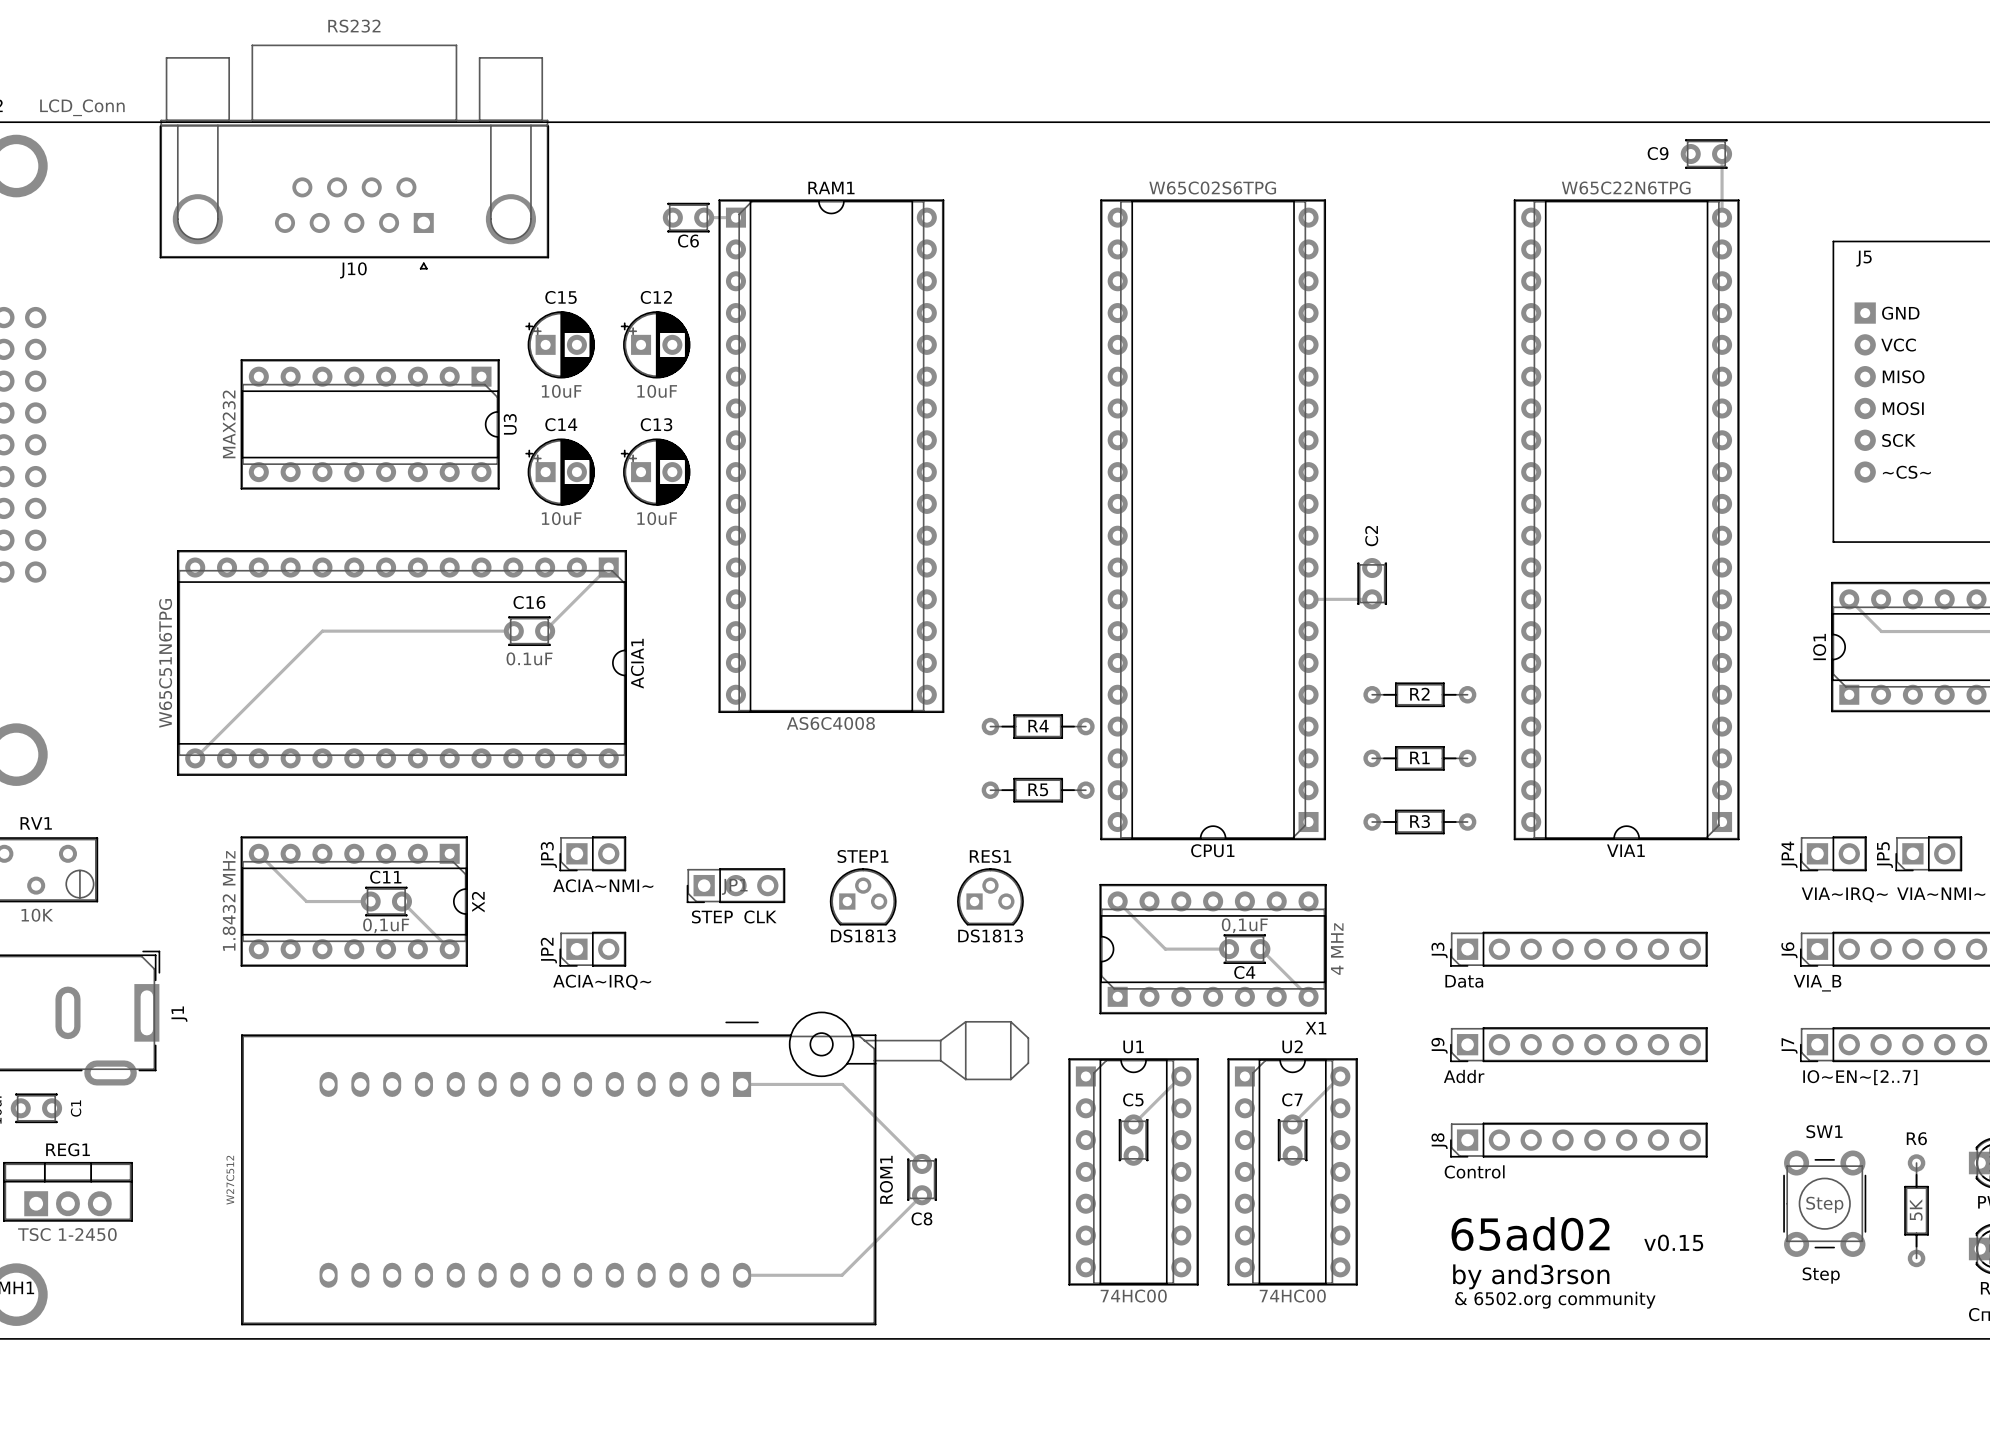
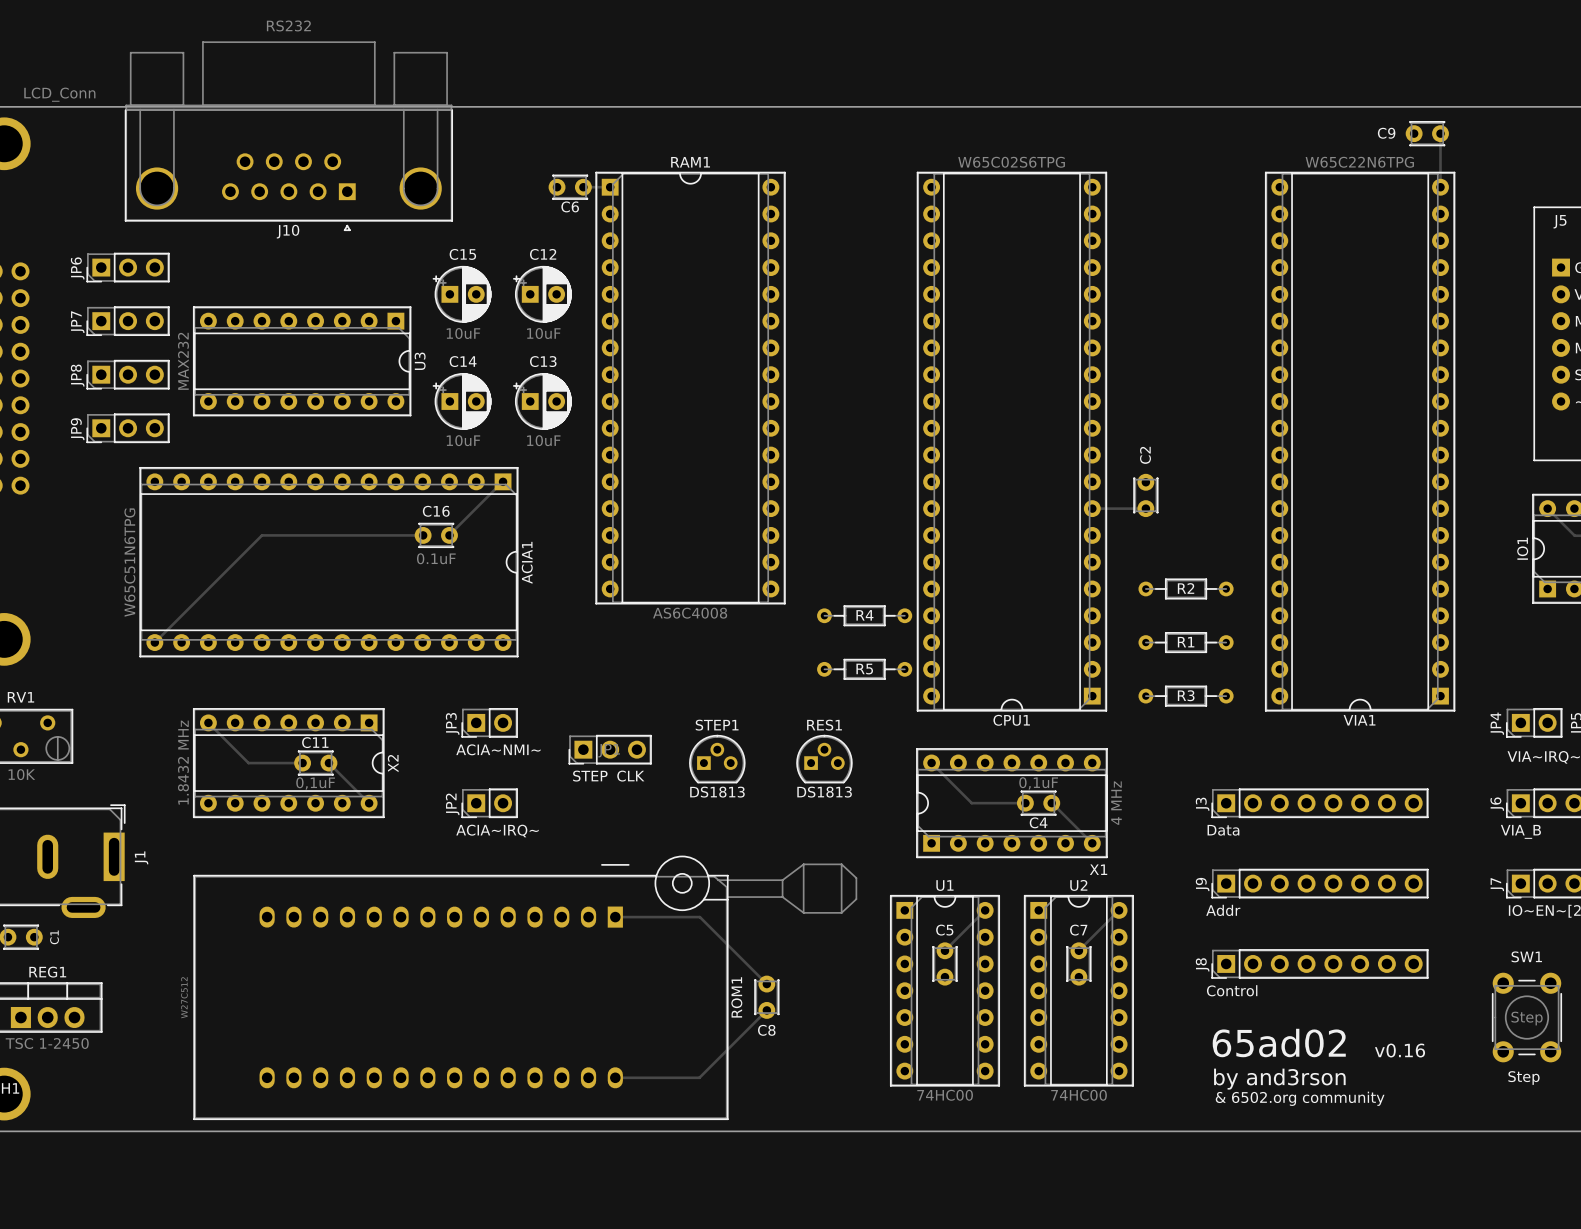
JP6: none -> (128, 267)
JP7: none -> (128, 321)
JP8: none -> (128, 374)
JP9: none -> (128, 428)
text: v0.15 (1673, 1242) -> v0.16 (1400, 1050)

